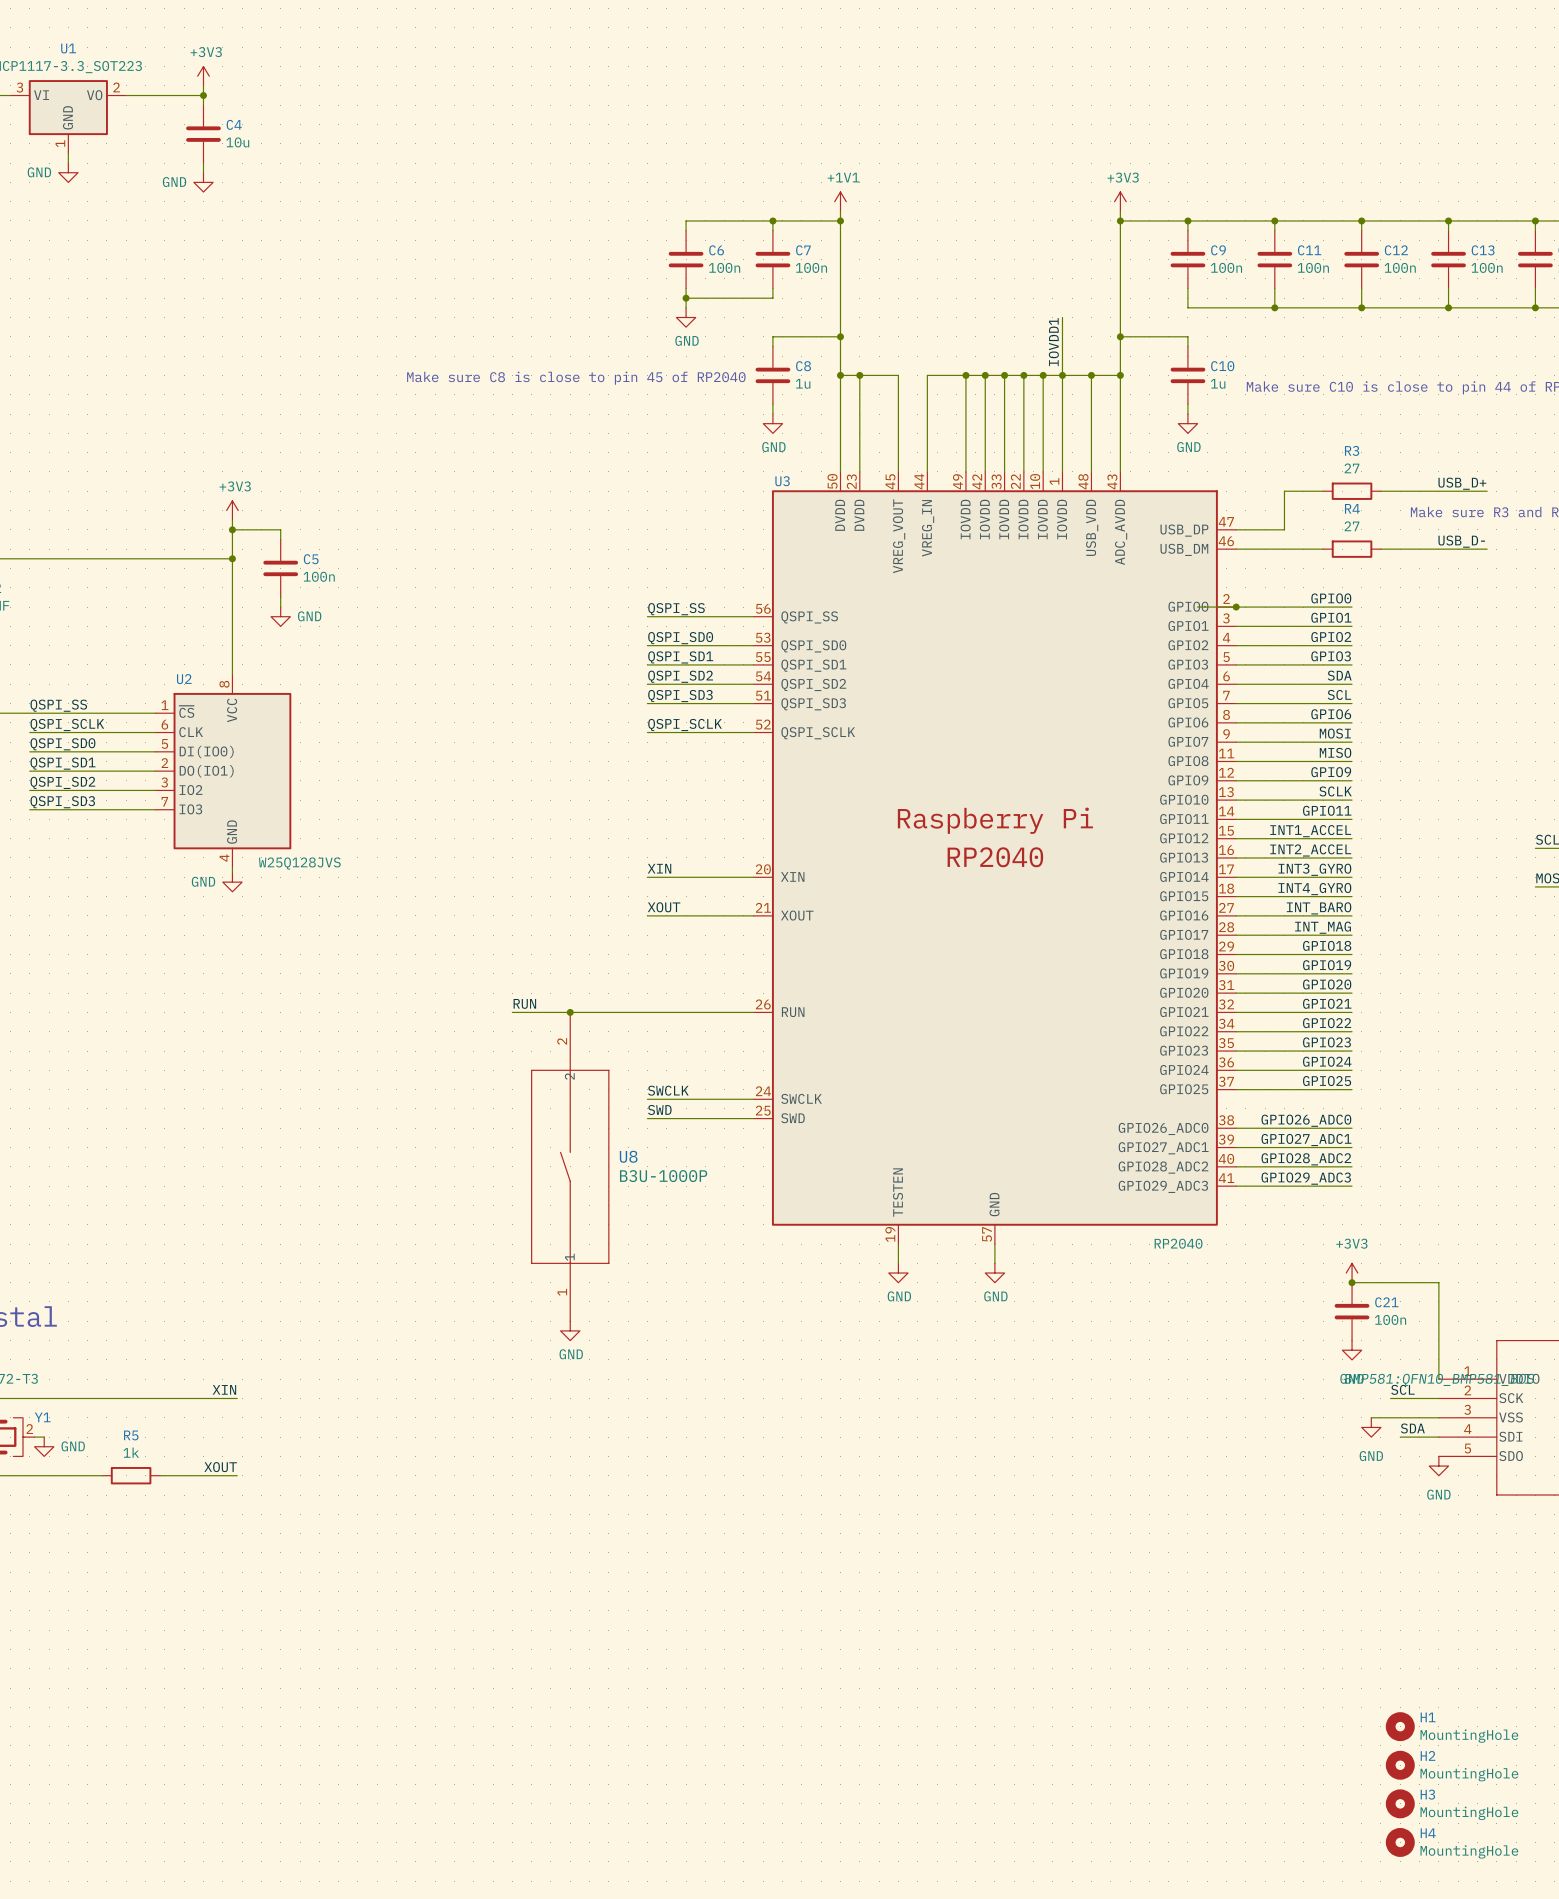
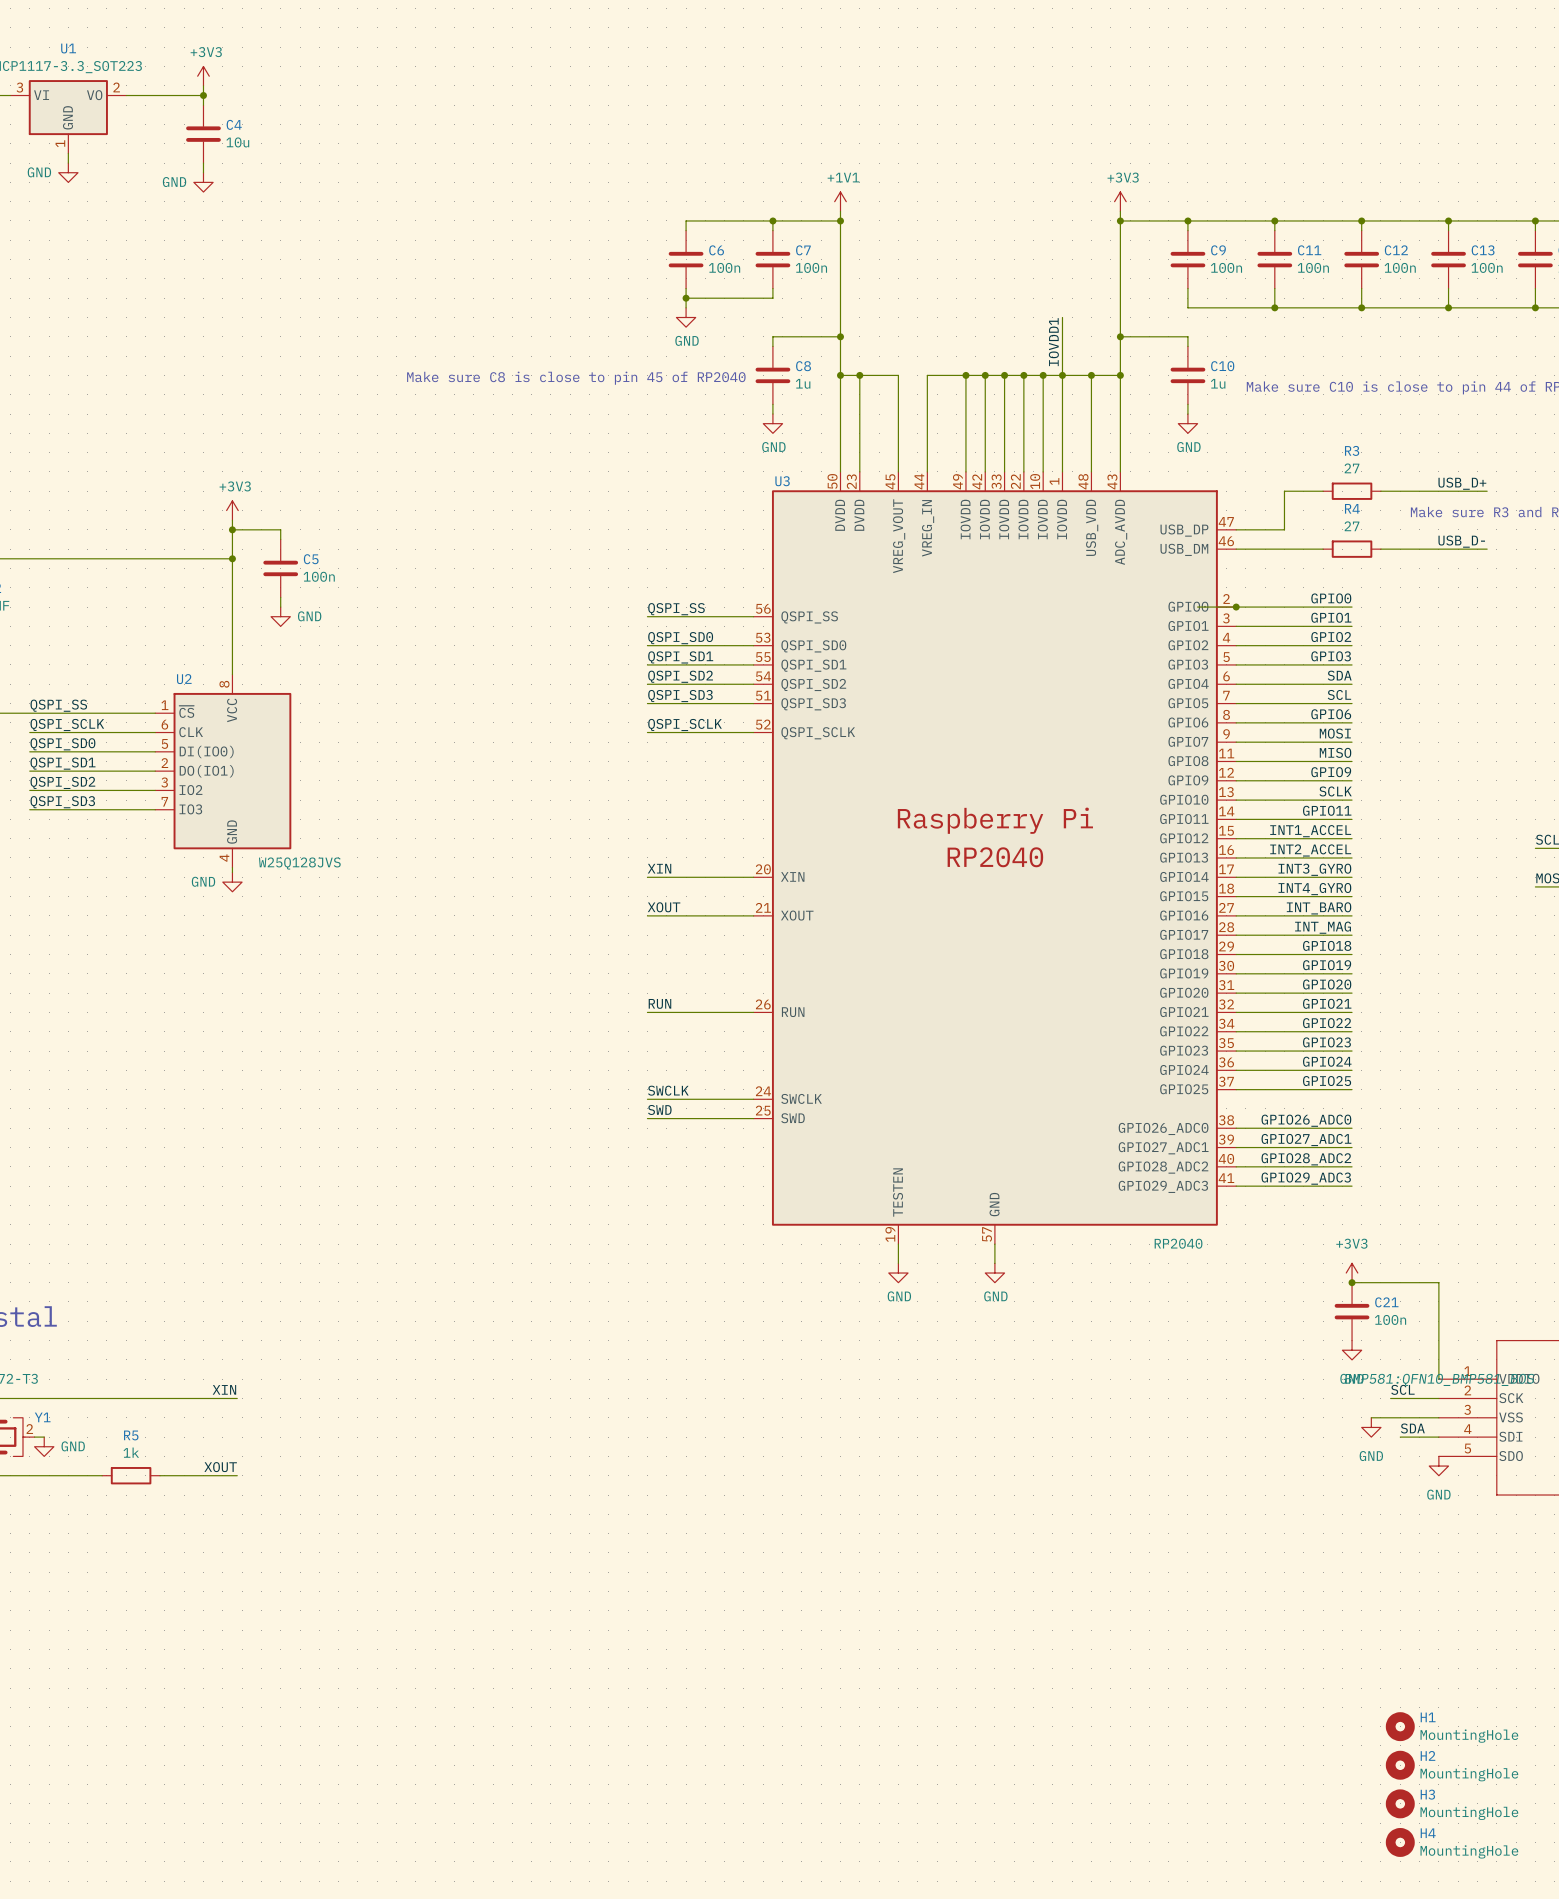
label position: RUN (524, 1003) -> RUN (659, 1003)
wire: (512, 1012) (647, 1012) -> none
junction: (570, 1012) -> none
U8: B3U-1000P (570, 1166) -> none
power symbol: GND (570, 1330) -> none

